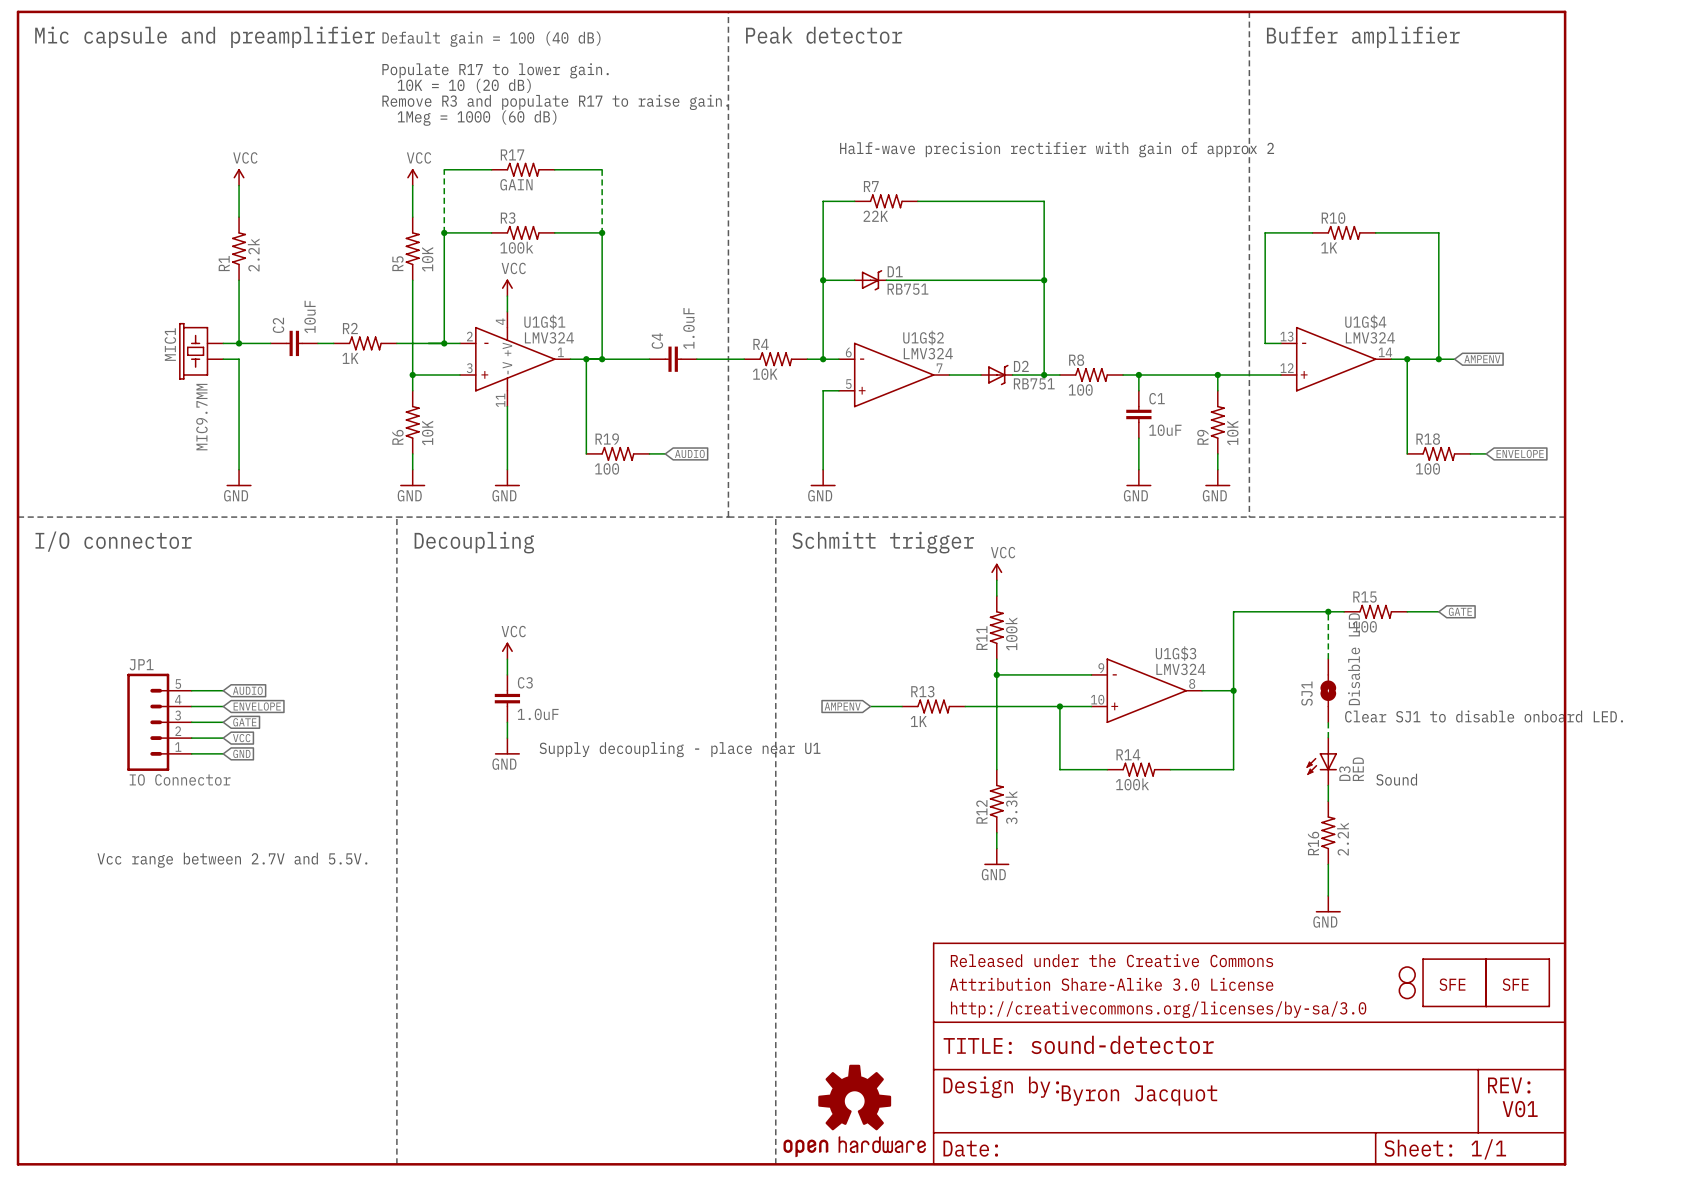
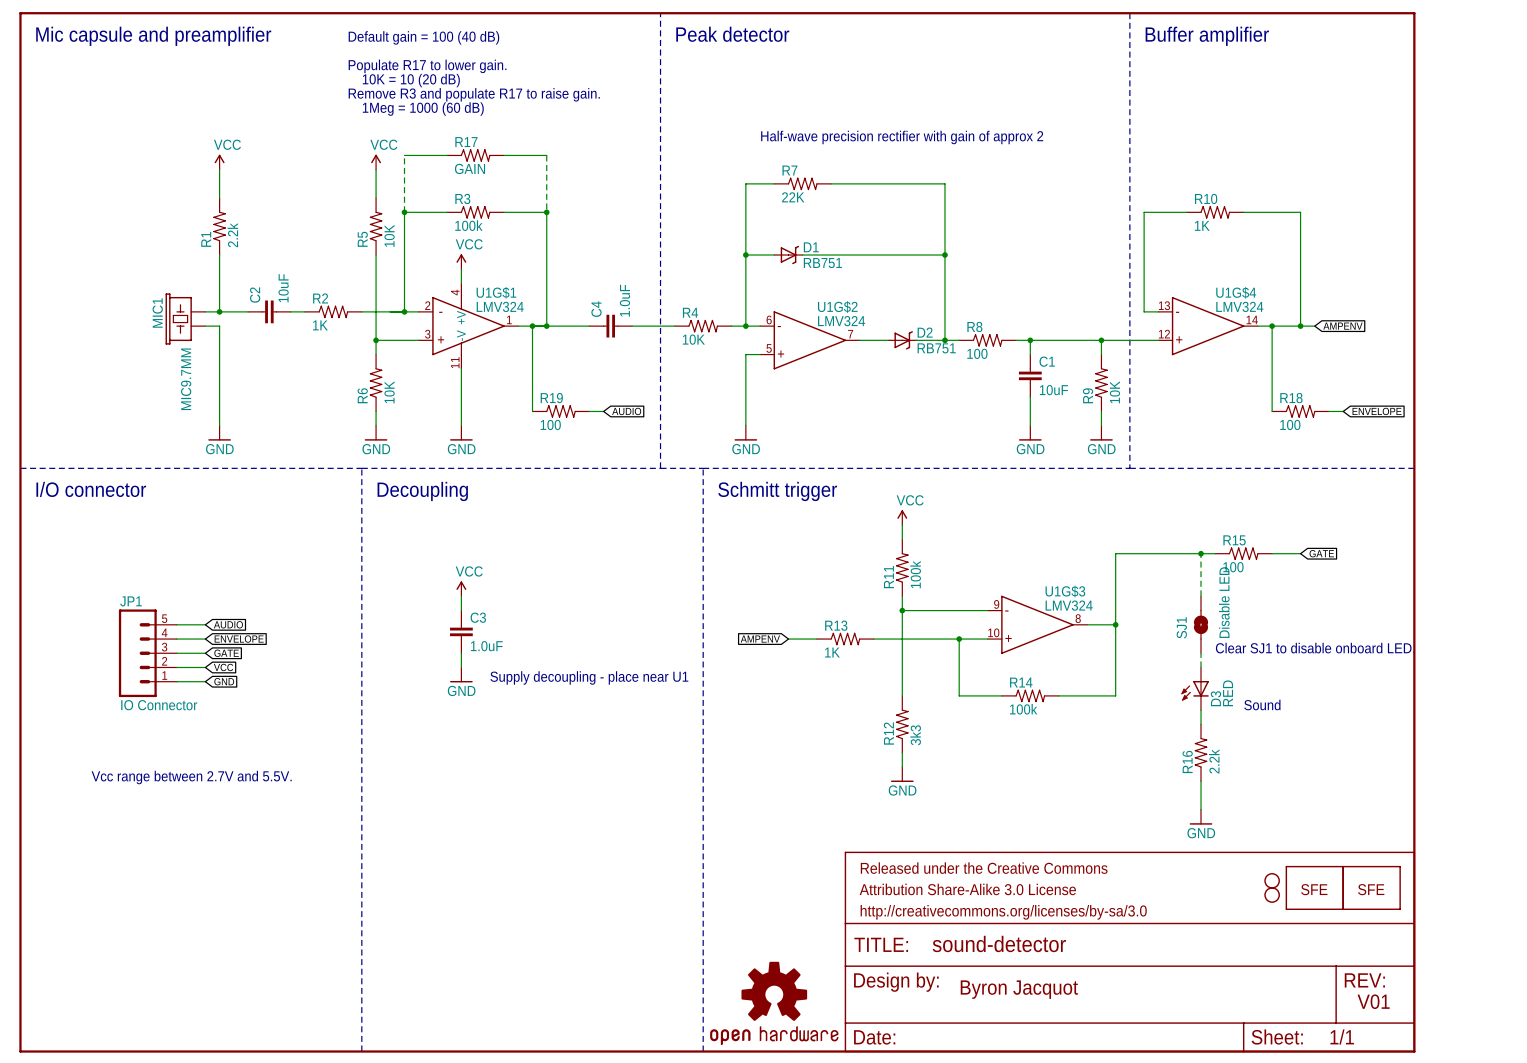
R12 value: 3.3k (1011, 807) -> 3k3 (915, 735)

